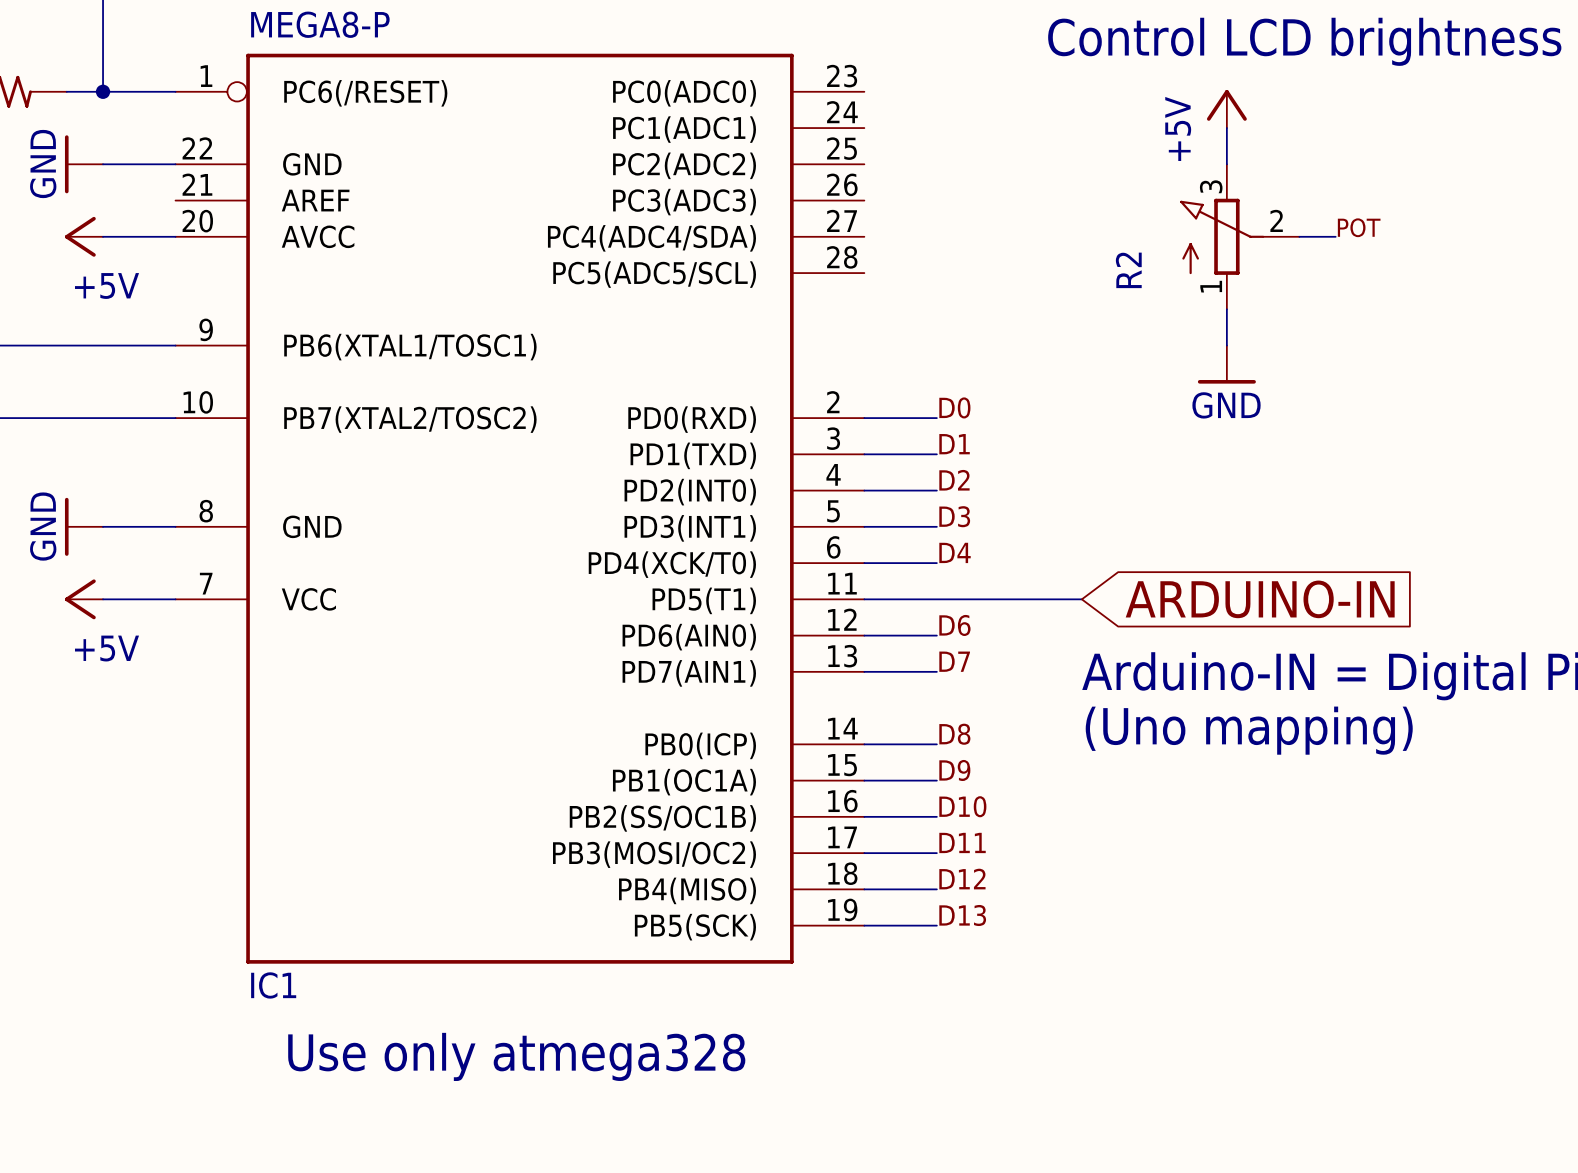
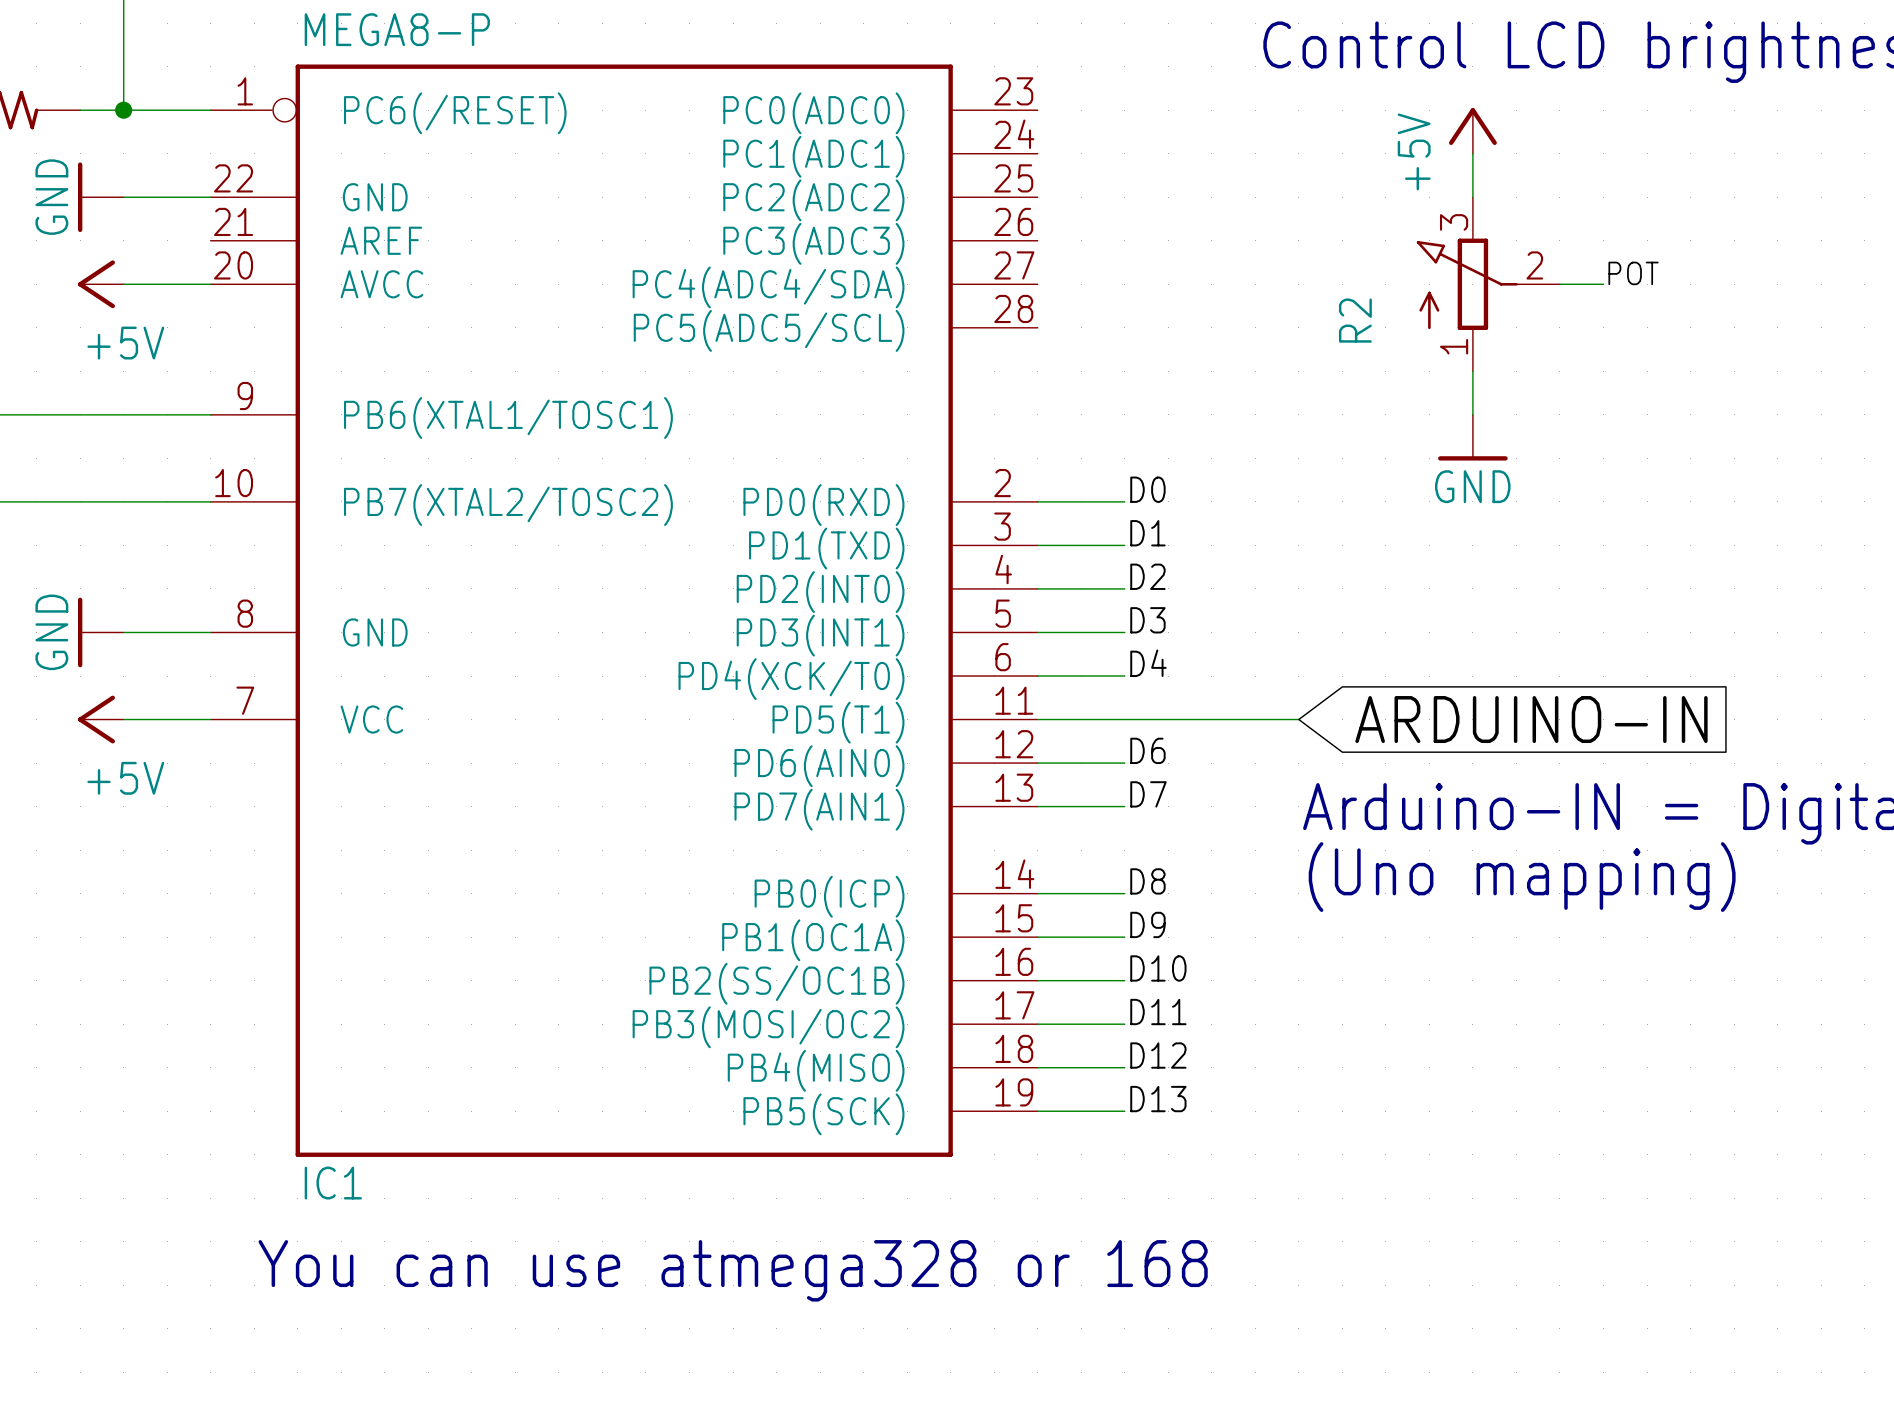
text: Use only atmega328 (516, 1056) -> none
text: none -> You can use atmega328 or 168 (733, 1270)

